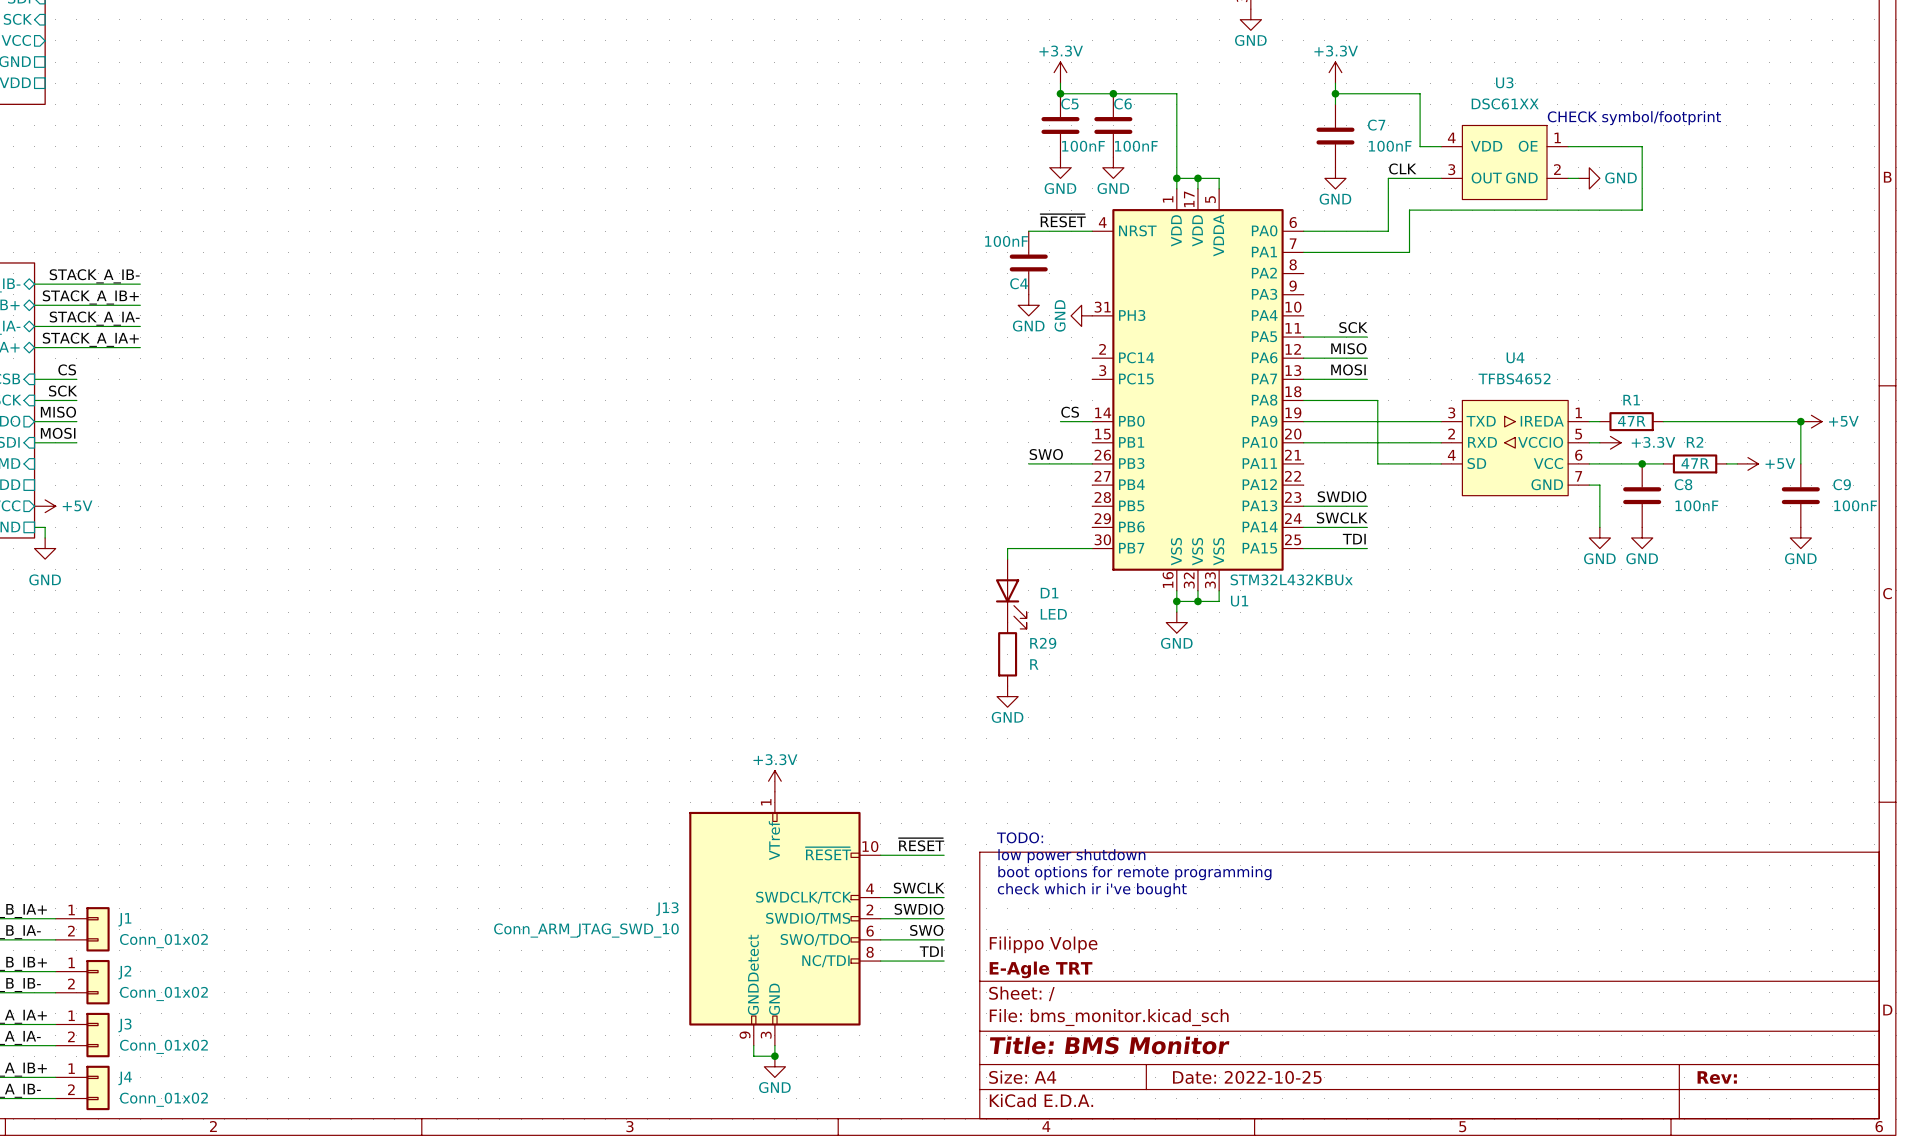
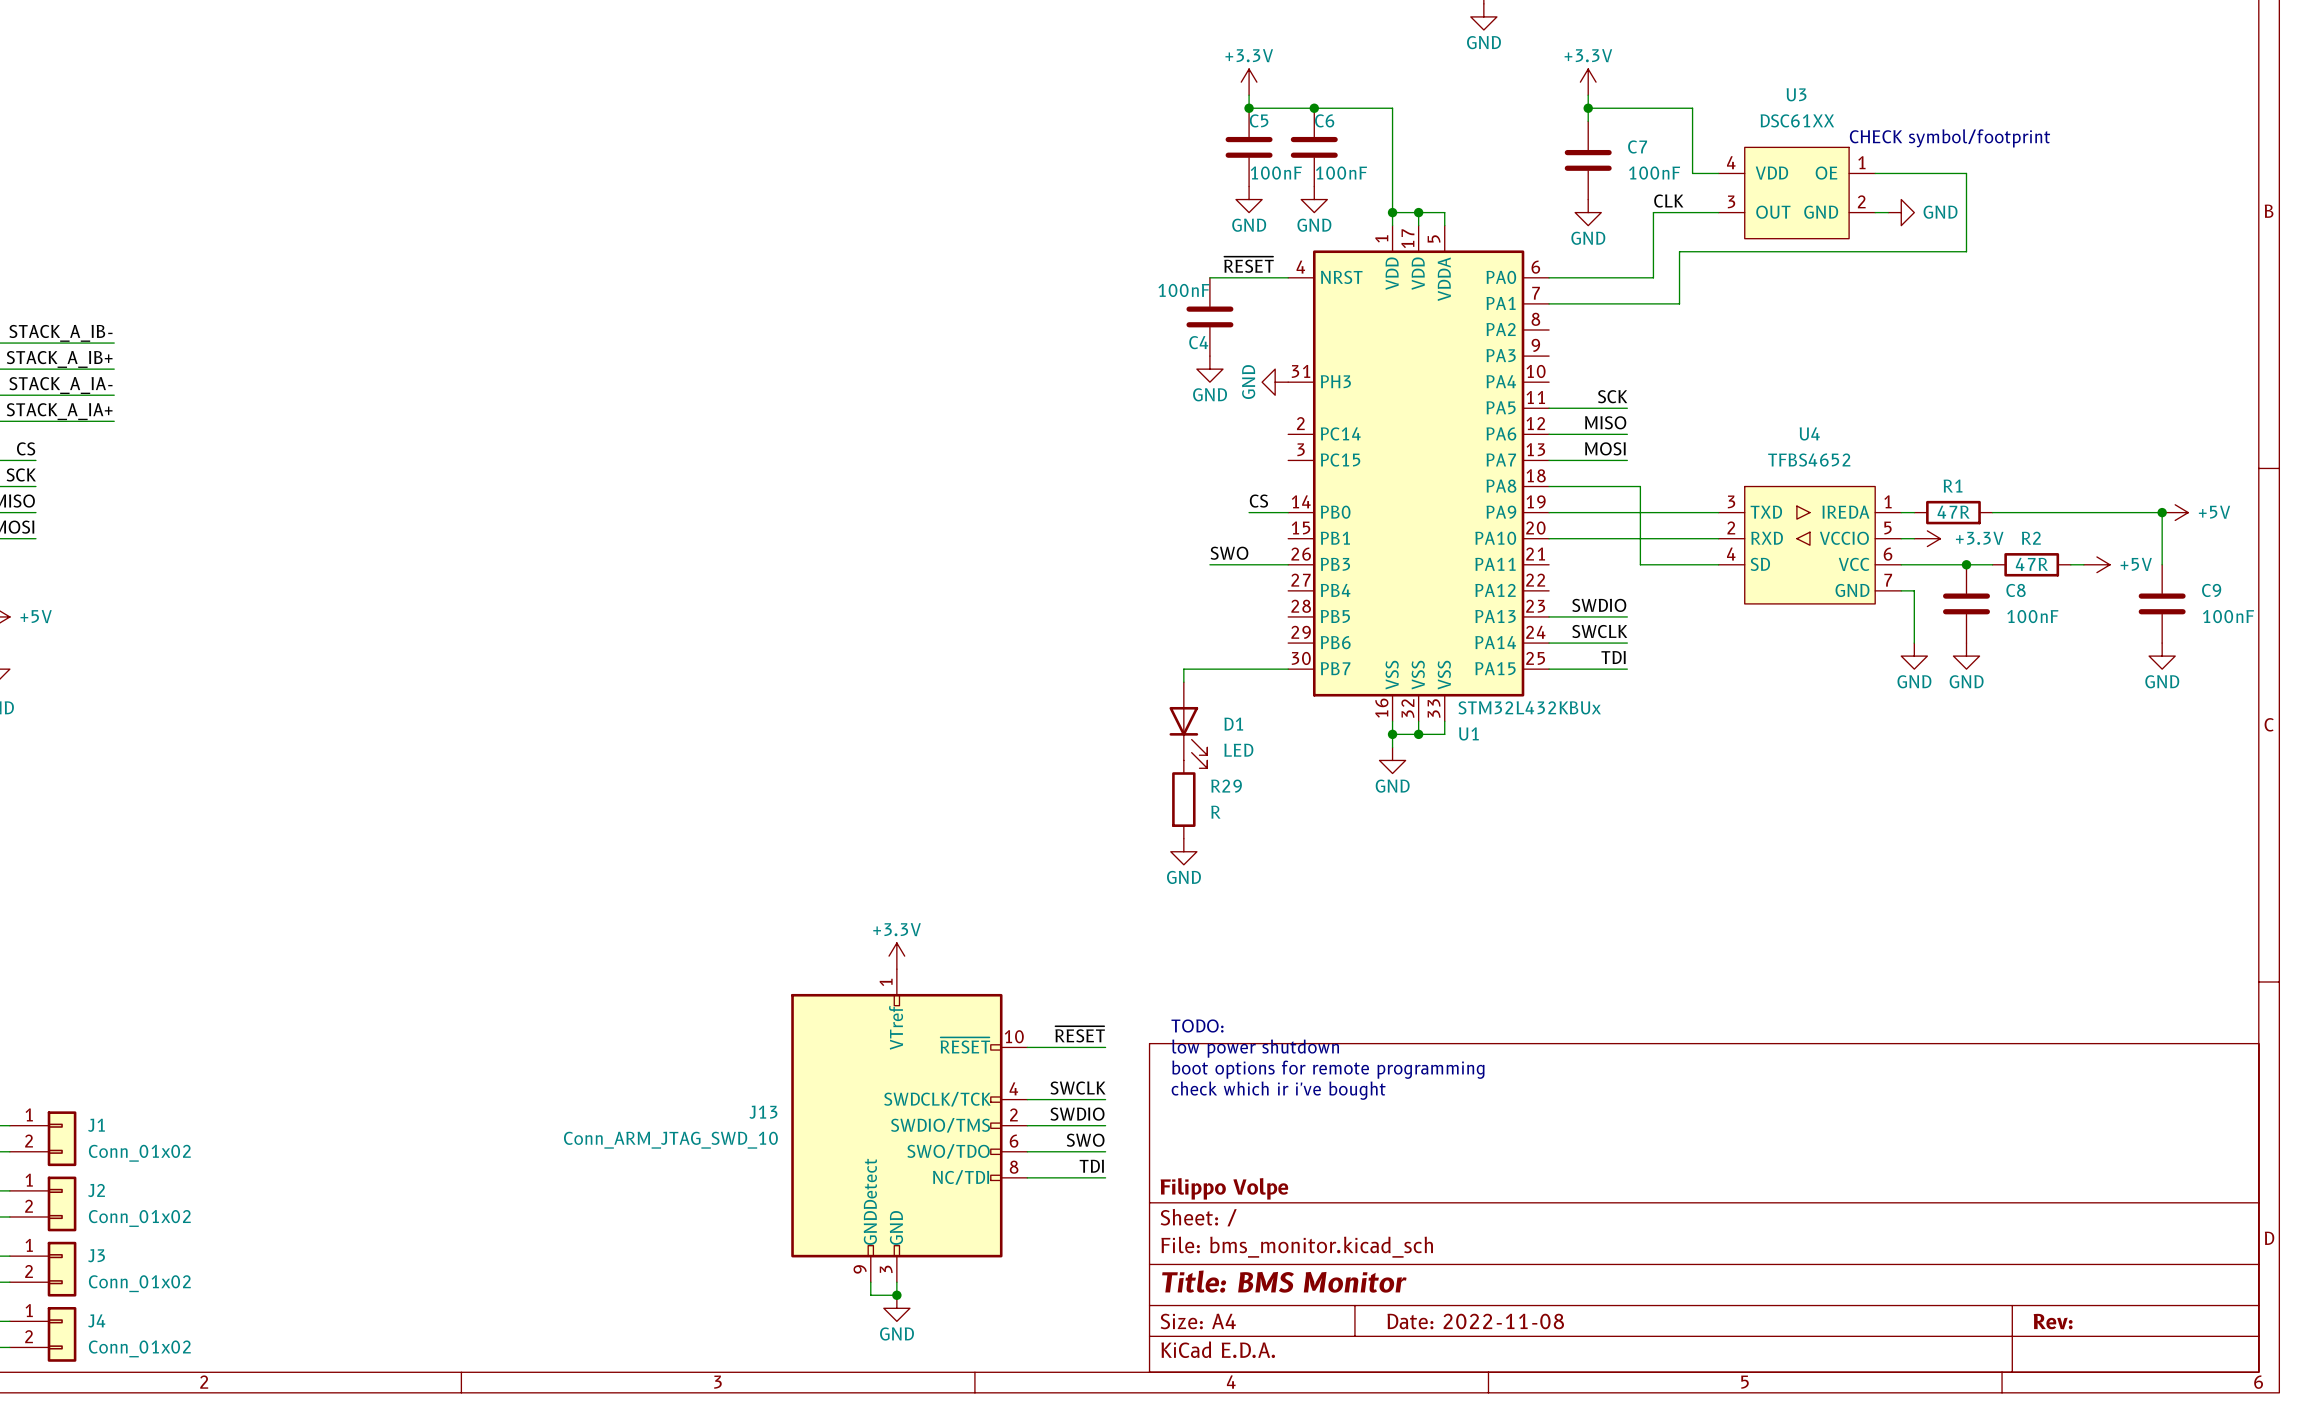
title block: Filippo Volpe (1043, 944) -> none
title block: E-Agle TRT (1041, 969) -> Filippo Volpe (1224, 1188)
title block: Date: 2022-10-25 (1247, 1077) -> Date: 2022-11-08 (1475, 1321)

